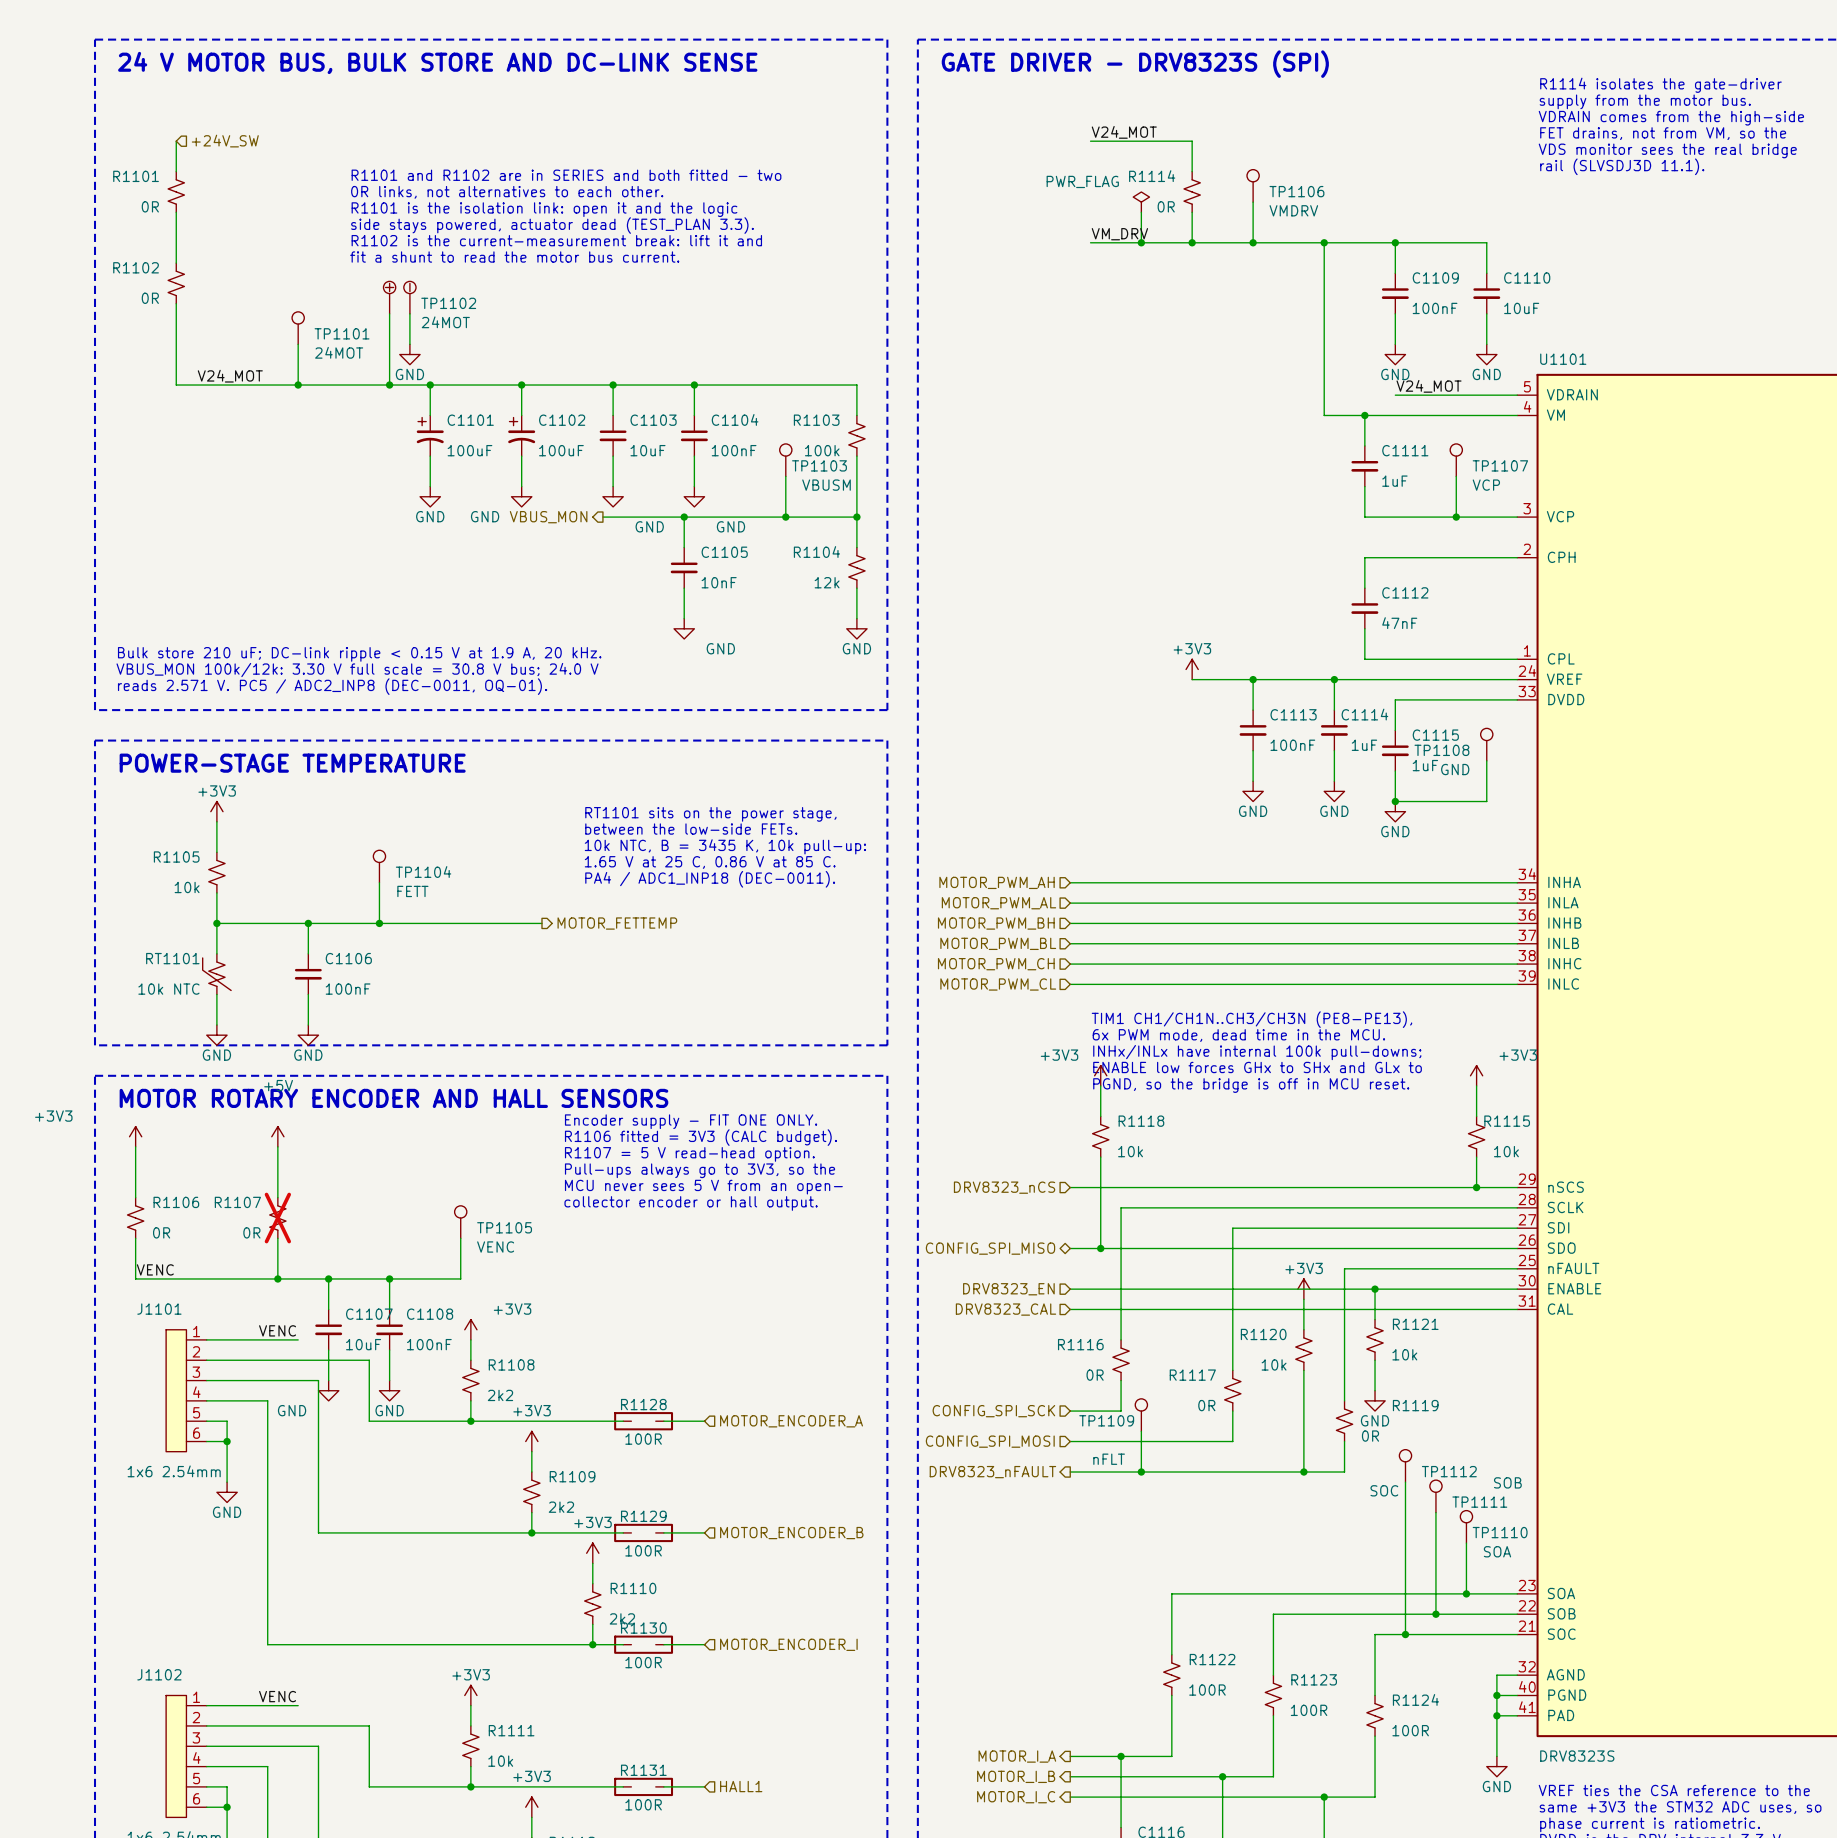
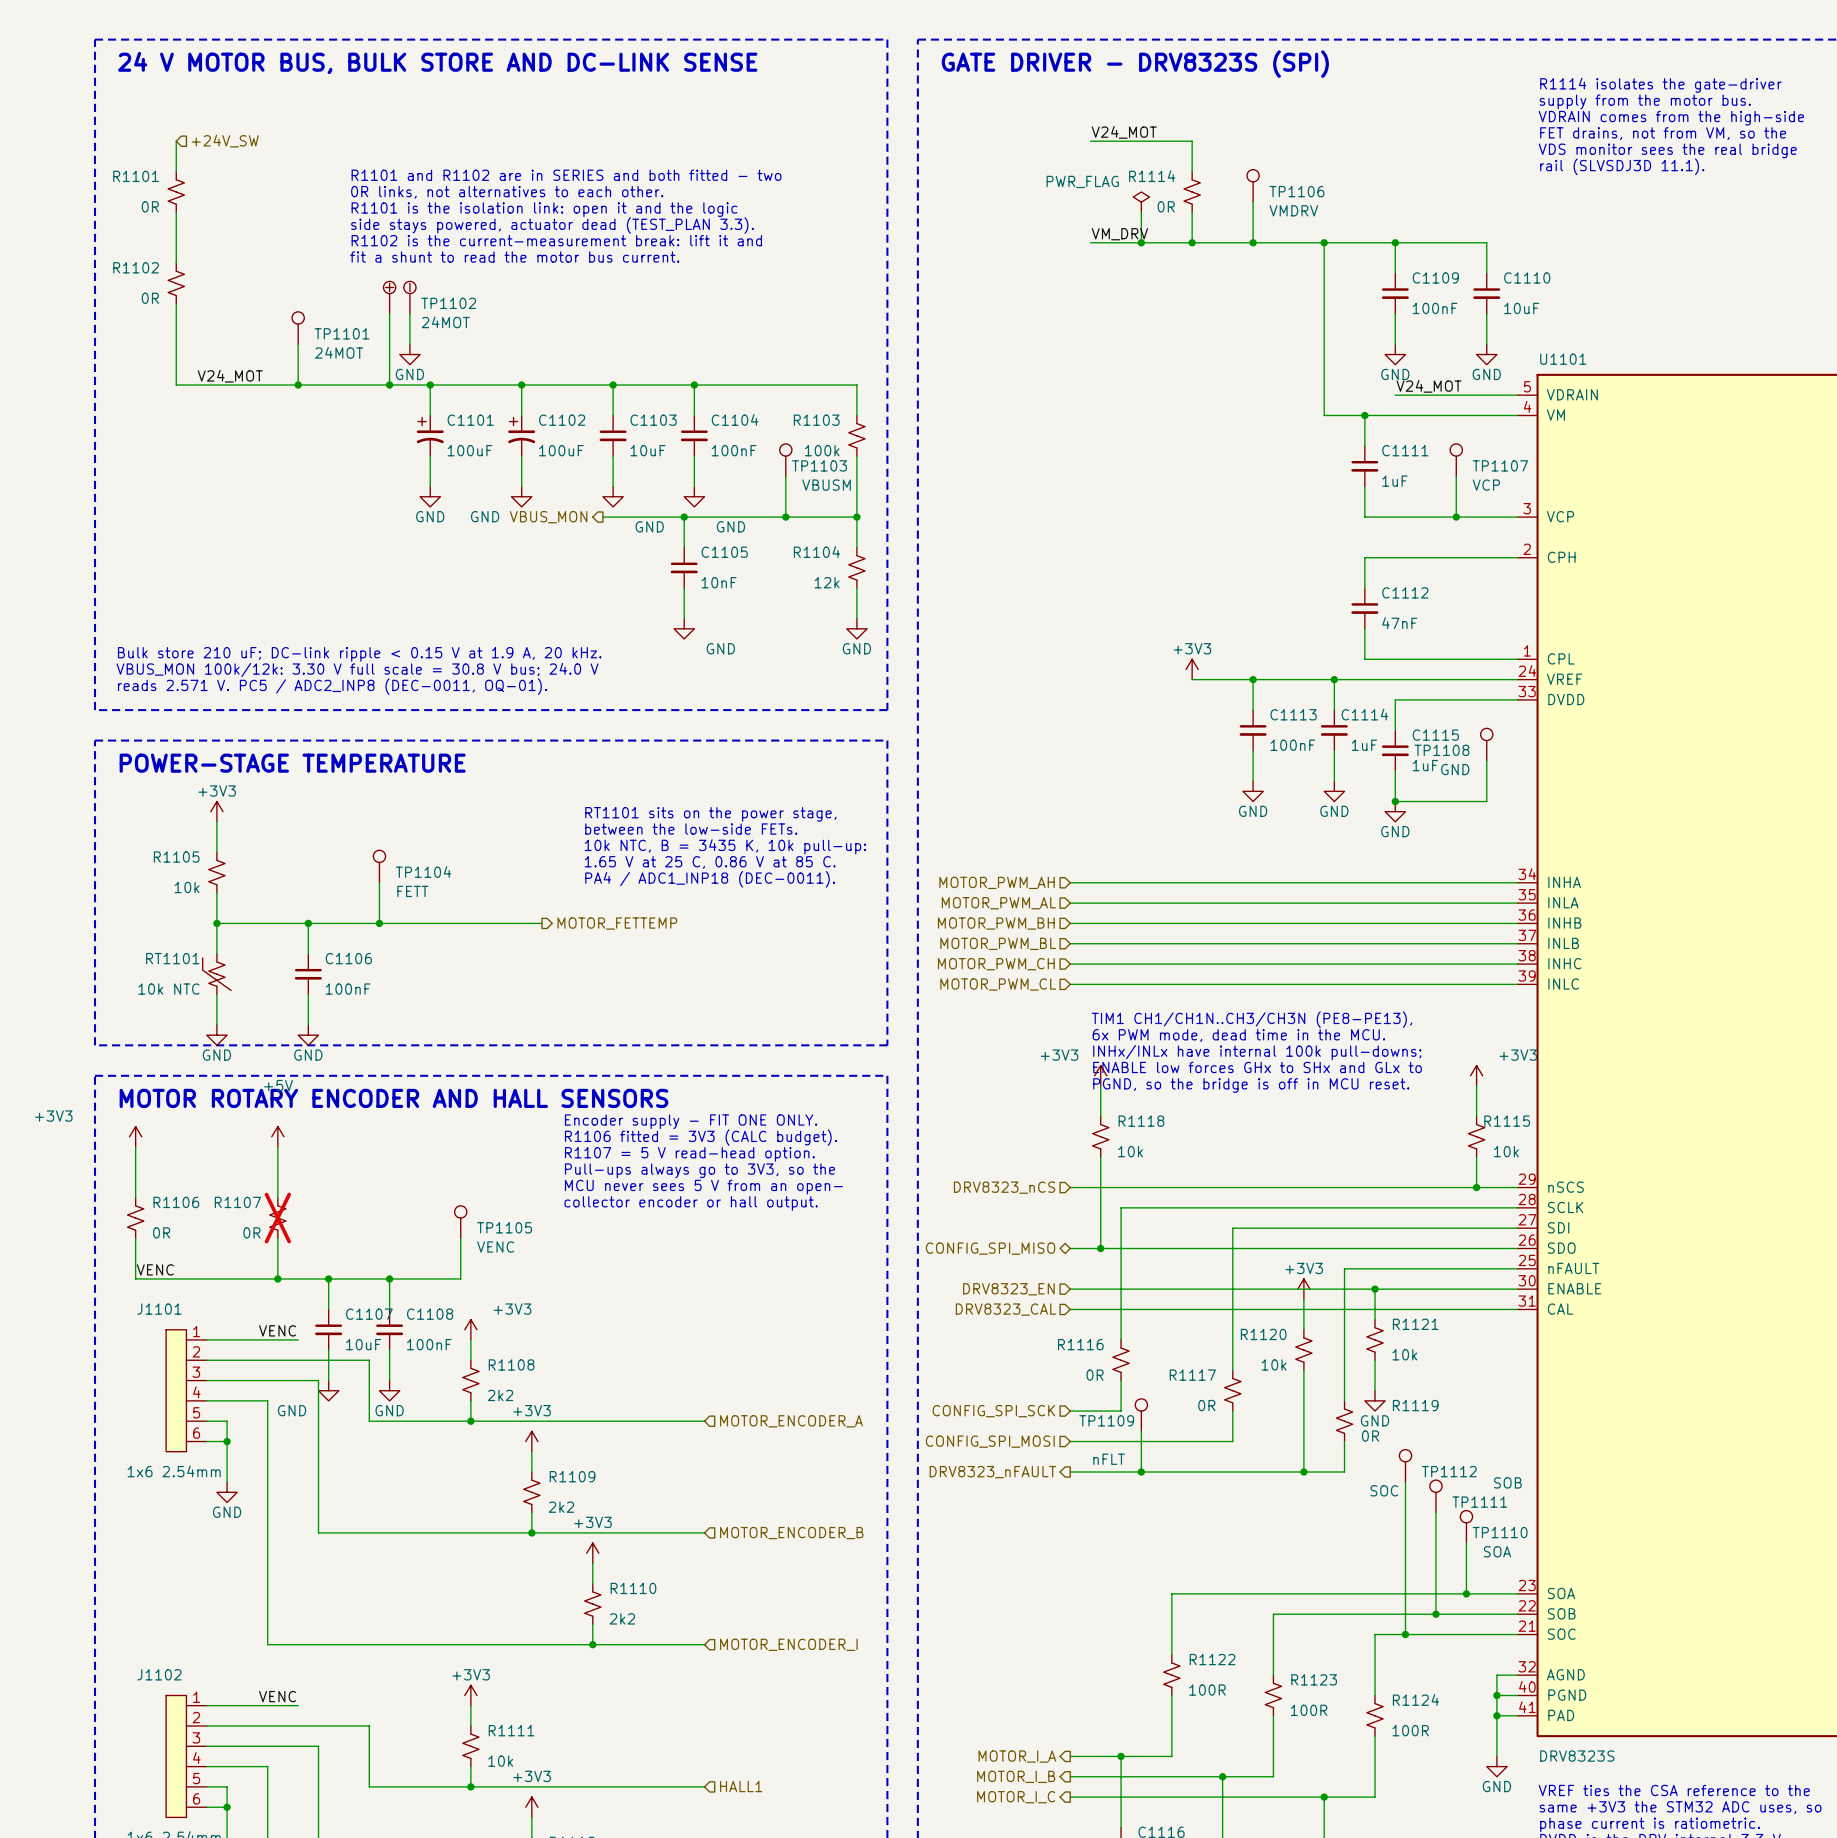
wire: none -> (623, 1421) (663, 1421)
R1128: 100R (643, 1421) -> none
wire: none -> (623, 1532) (663, 1532)
R1129: 100R (643, 1532) -> none
wire: none -> (623, 1644) (663, 1644)
R1130: 100R (643, 1644) -> none
wire: none -> (623, 1786) (663, 1786)
R1131: 100R (643, 1786) -> none

